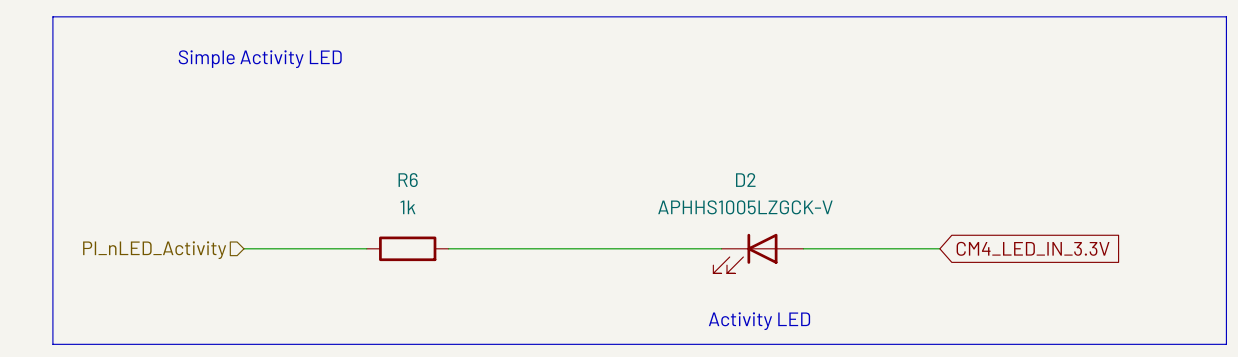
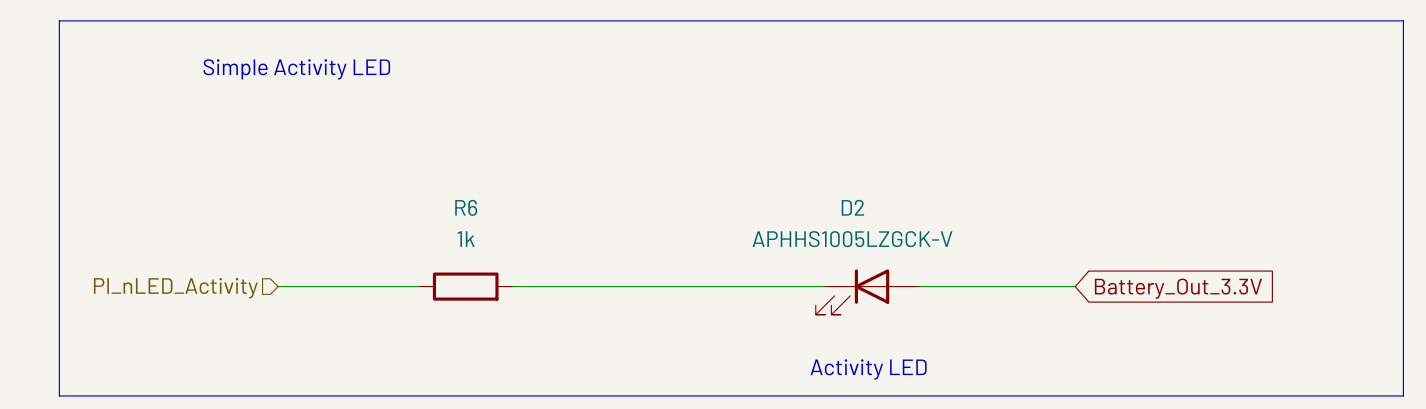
global label: CM4_LED_IN_3.3V (1033, 248) -> Battery_Out_3.3V (1178, 288)

